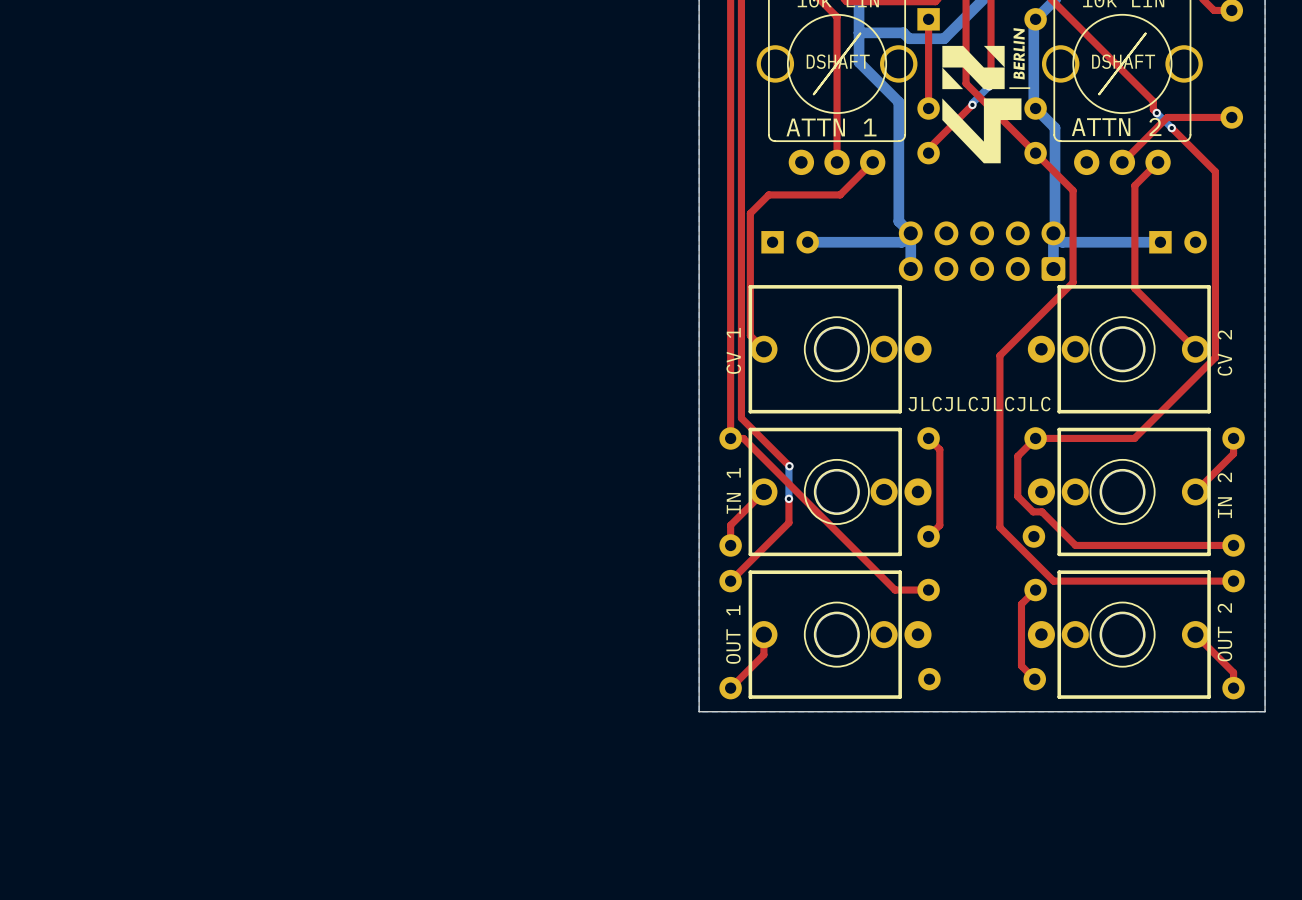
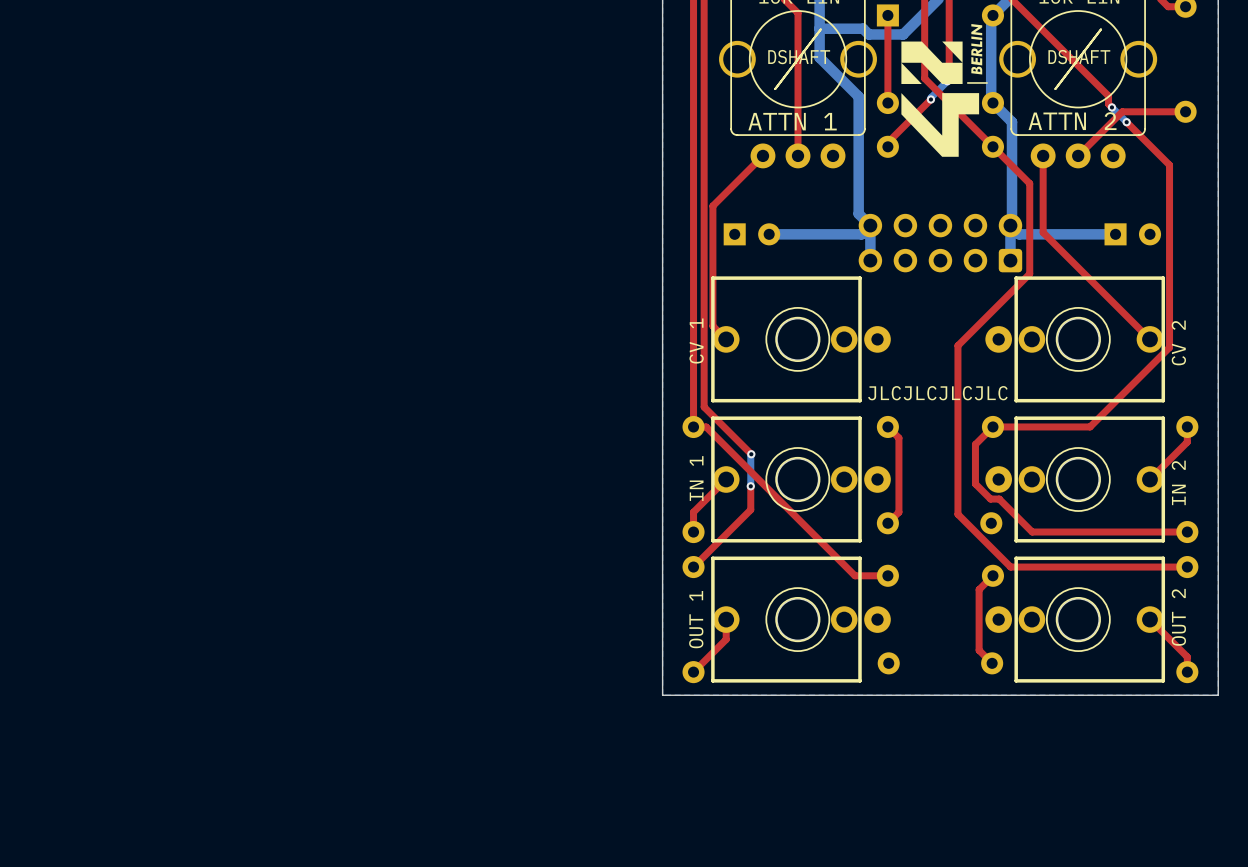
top track: (872, 162) (840, 194) (768, 194) -> (762, 155) (731, 187)
top track: (1158, 162) (1134, 185) (1134, 288) -> (1043, 155) (1043, 232) (1090, 279)

